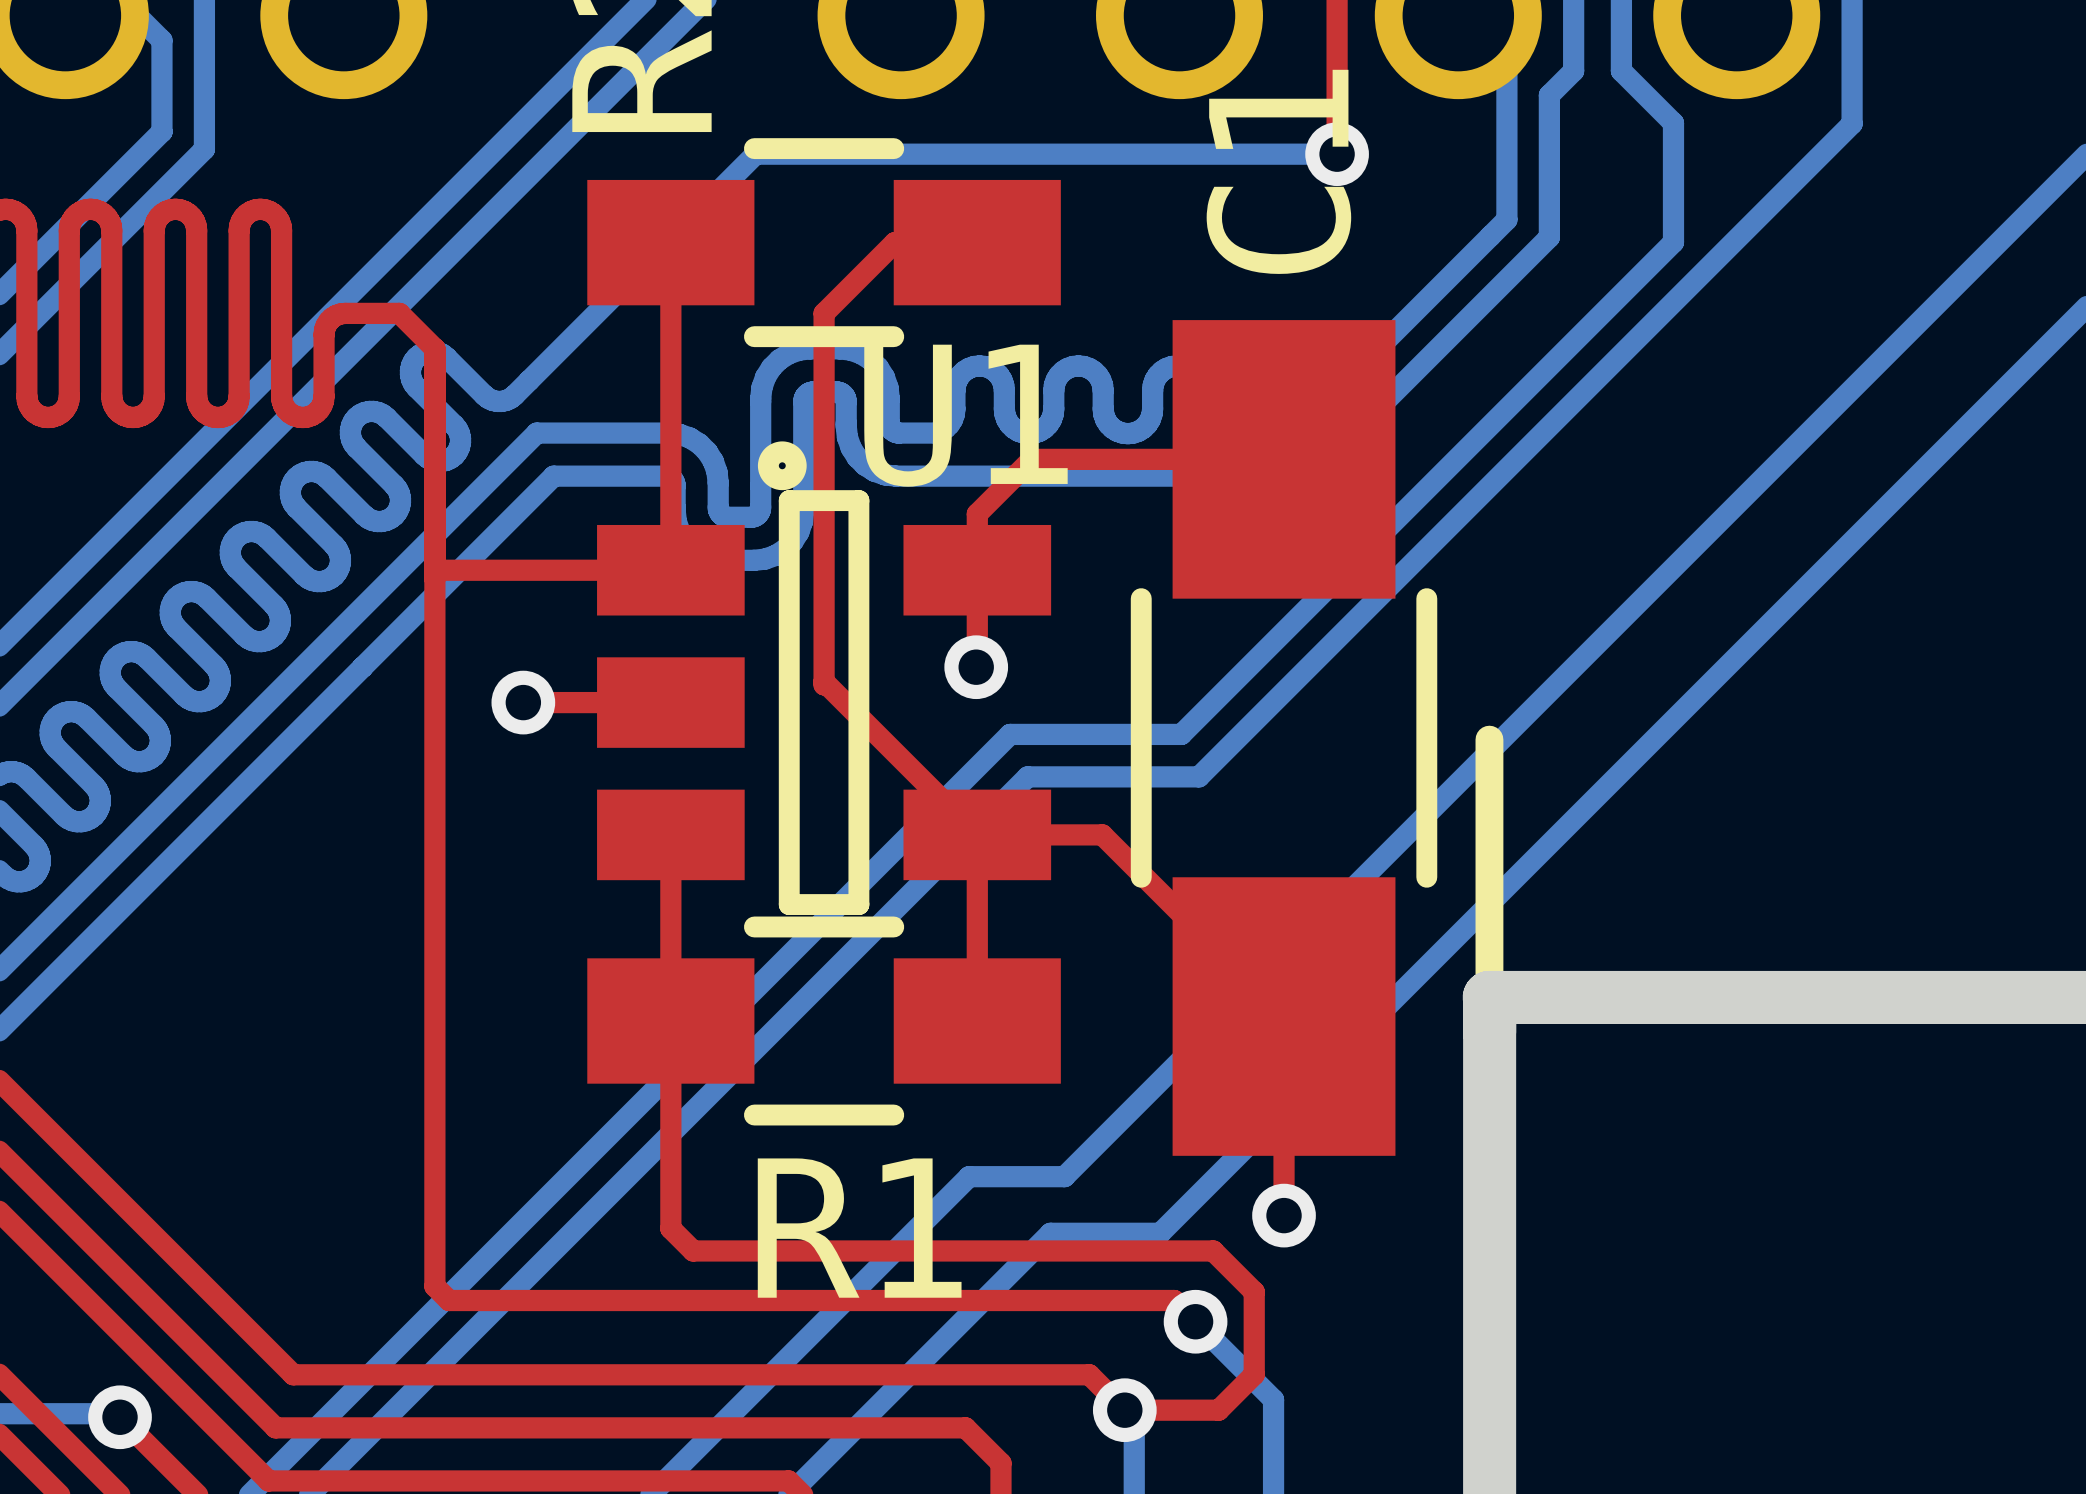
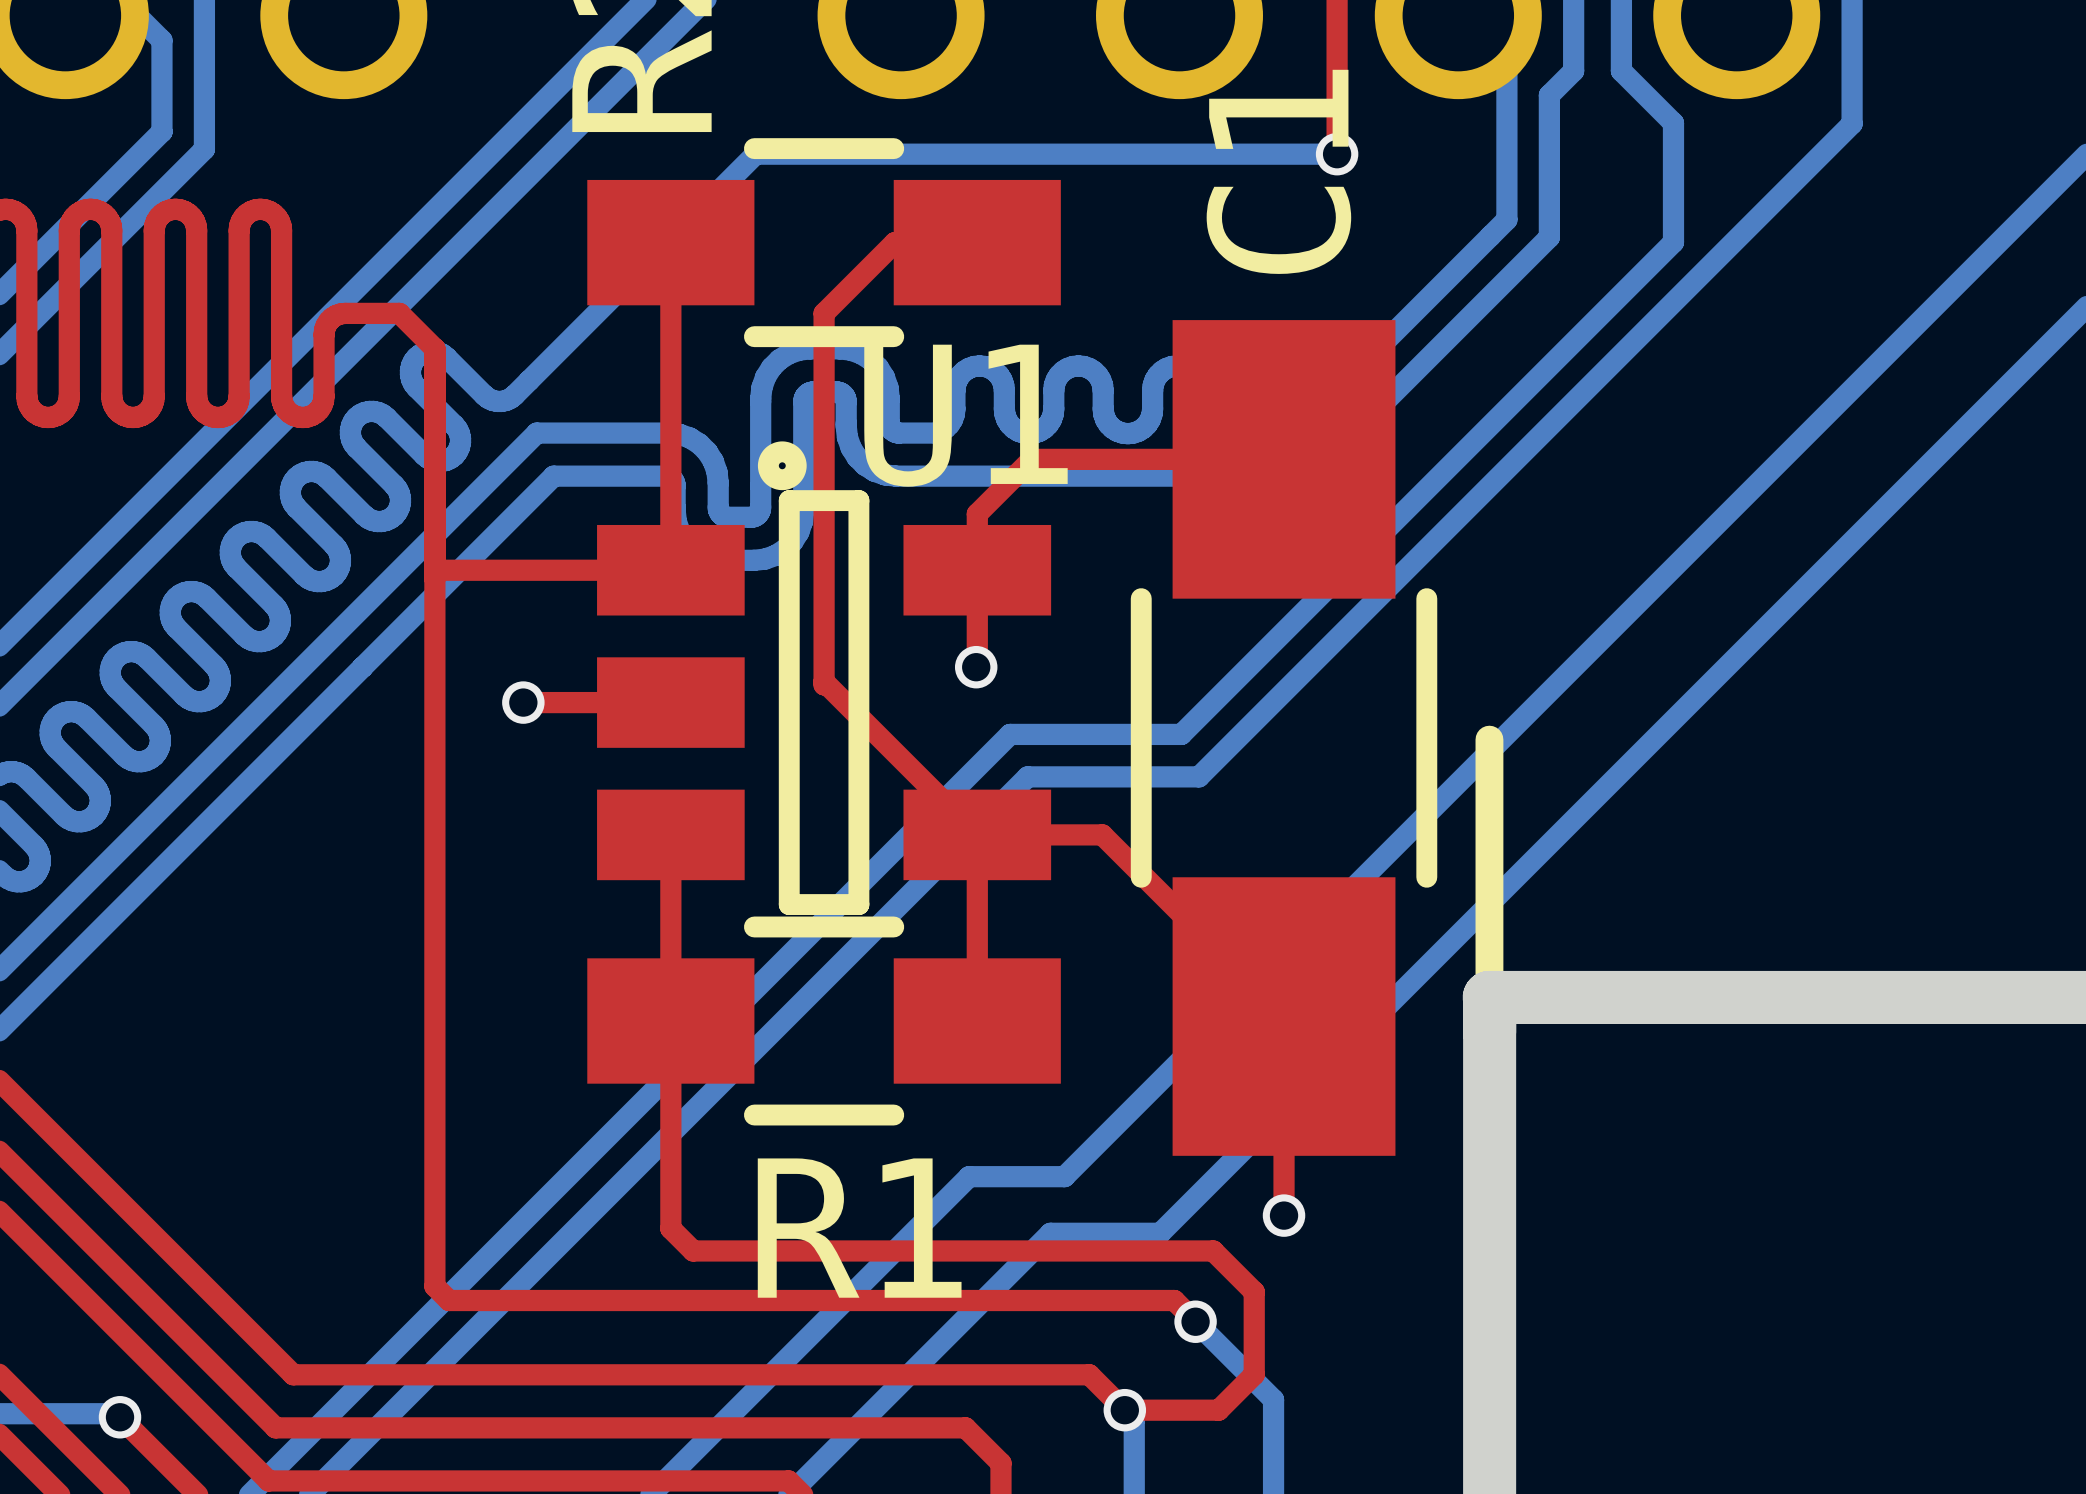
via size: [1305, 122, 1369, 187] -> [1315, 132, 1359, 176]
via size: [944, 635, 1009, 700] -> [954, 645, 998, 689]
via size: [491, 670, 556, 735] -> [502, 681, 545, 724]
via size: [1252, 1183, 1316, 1248] -> [1262, 1194, 1306, 1237]
via size: [1163, 1289, 1228, 1354] -> [1174, 1300, 1217, 1343]
via size: [1092, 1378, 1157, 1443] -> [1103, 1388, 1147, 1432]
via size: [88, 1385, 152, 1450] -> [98, 1396, 142, 1439]

